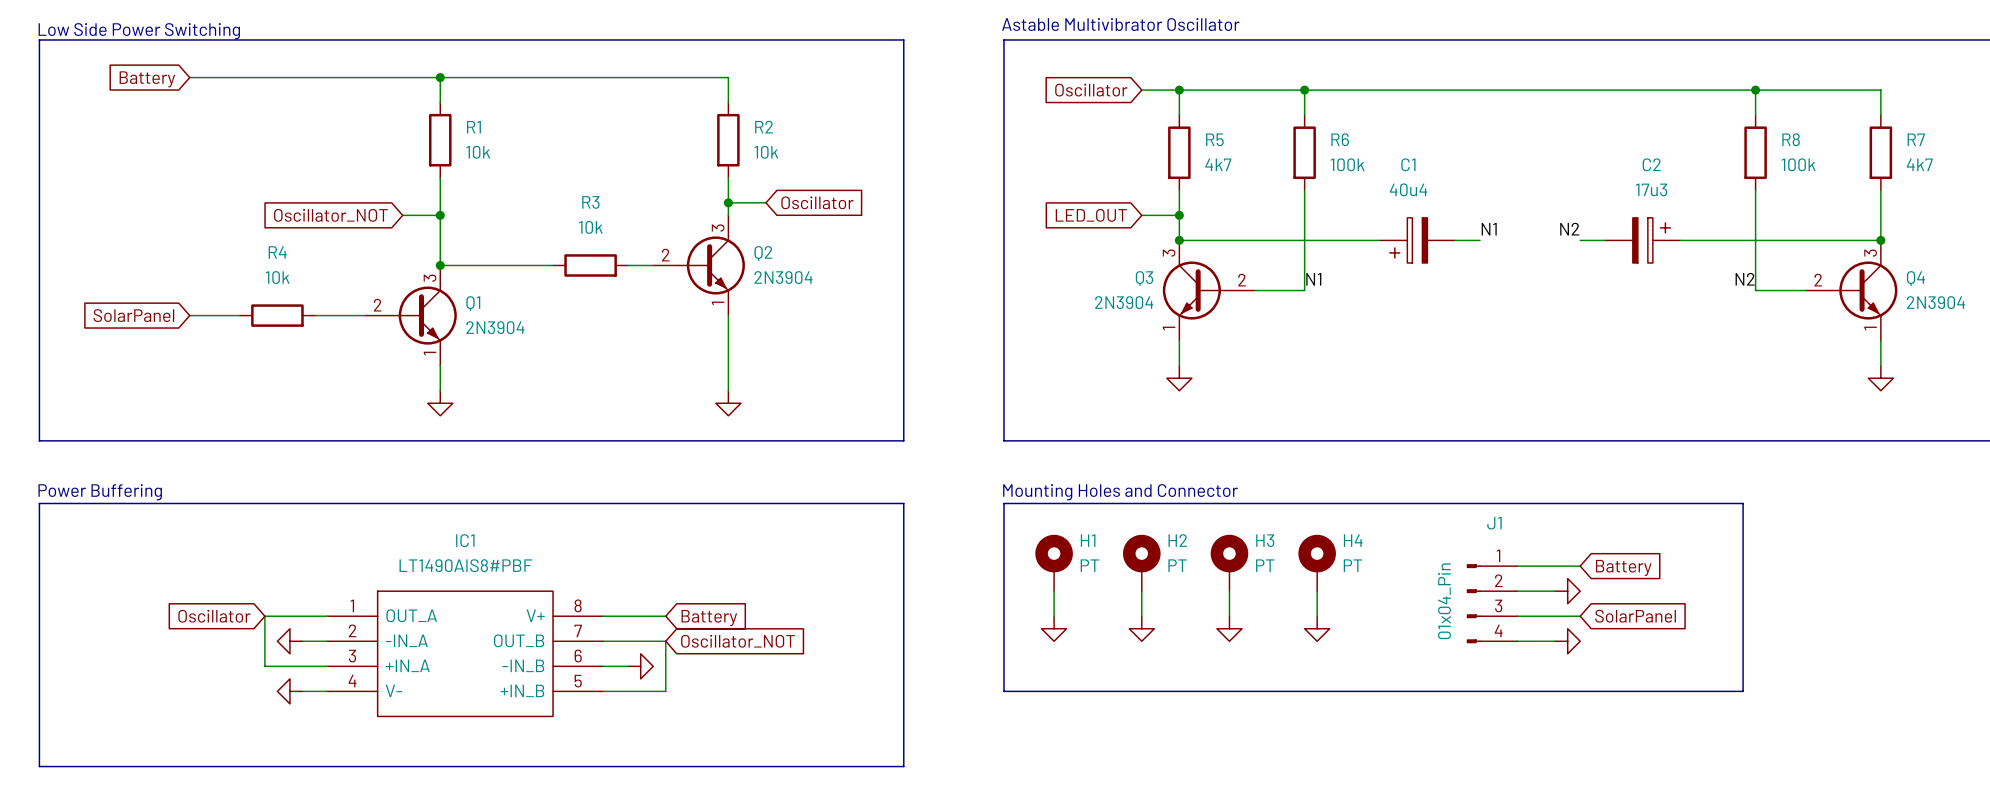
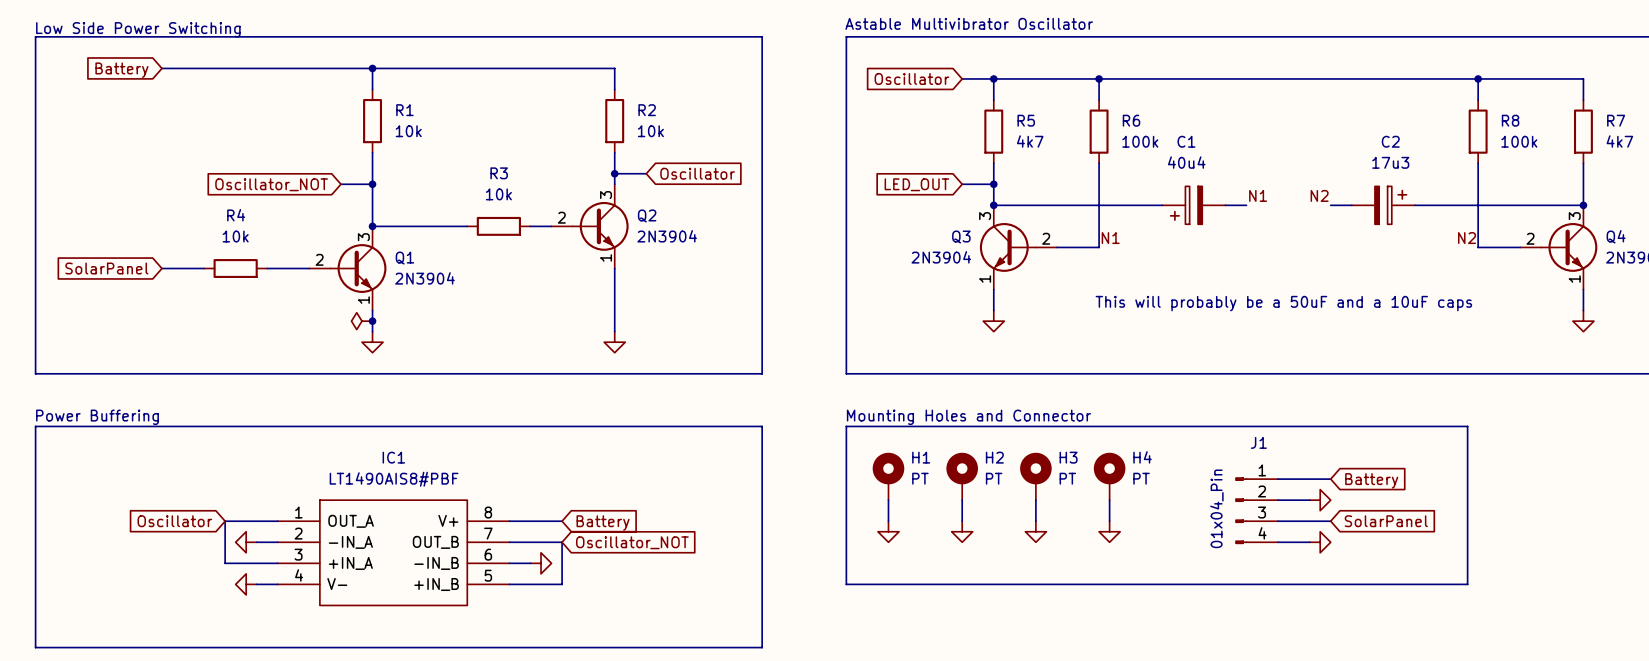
text: none -> This will probably be a 50uF and a 10uF caps (1283, 303)
power symbol: none -> (362, 321)
junction: none -> (372, 321)

